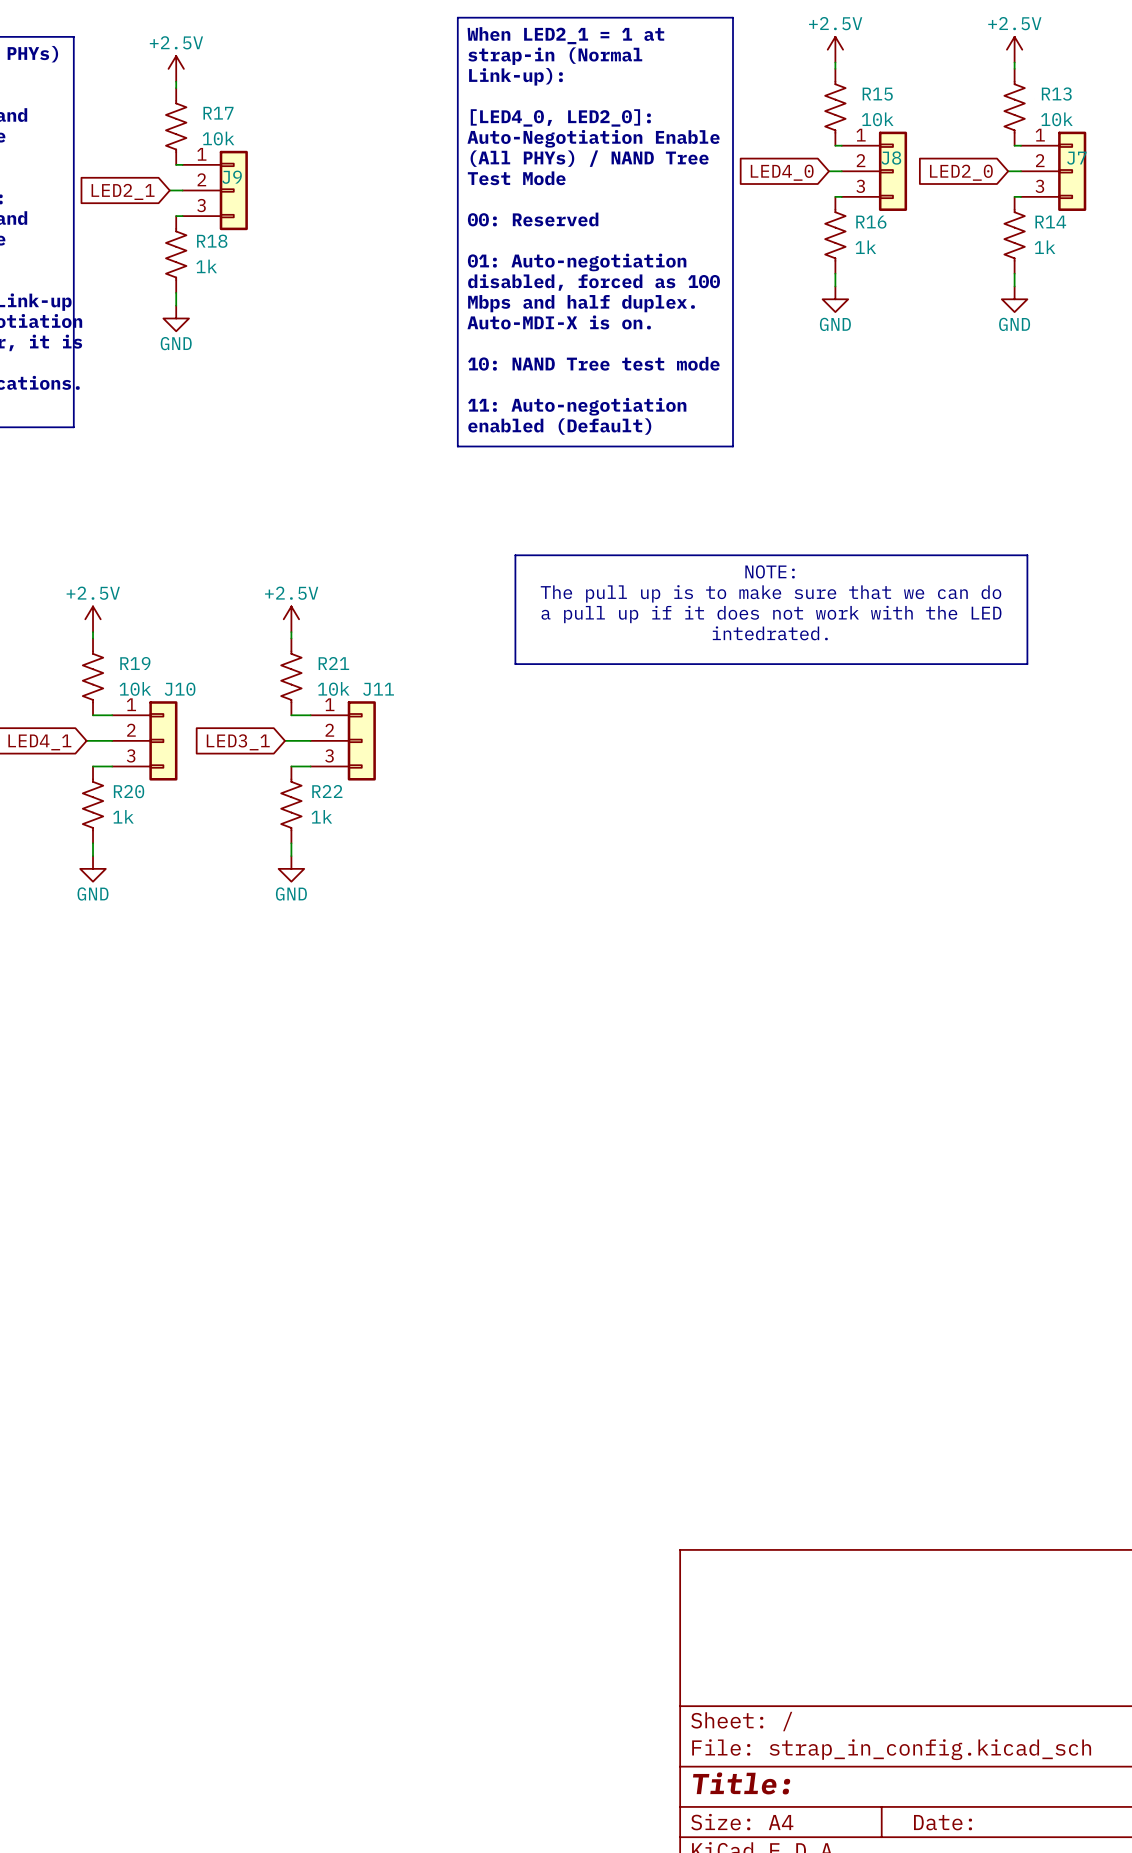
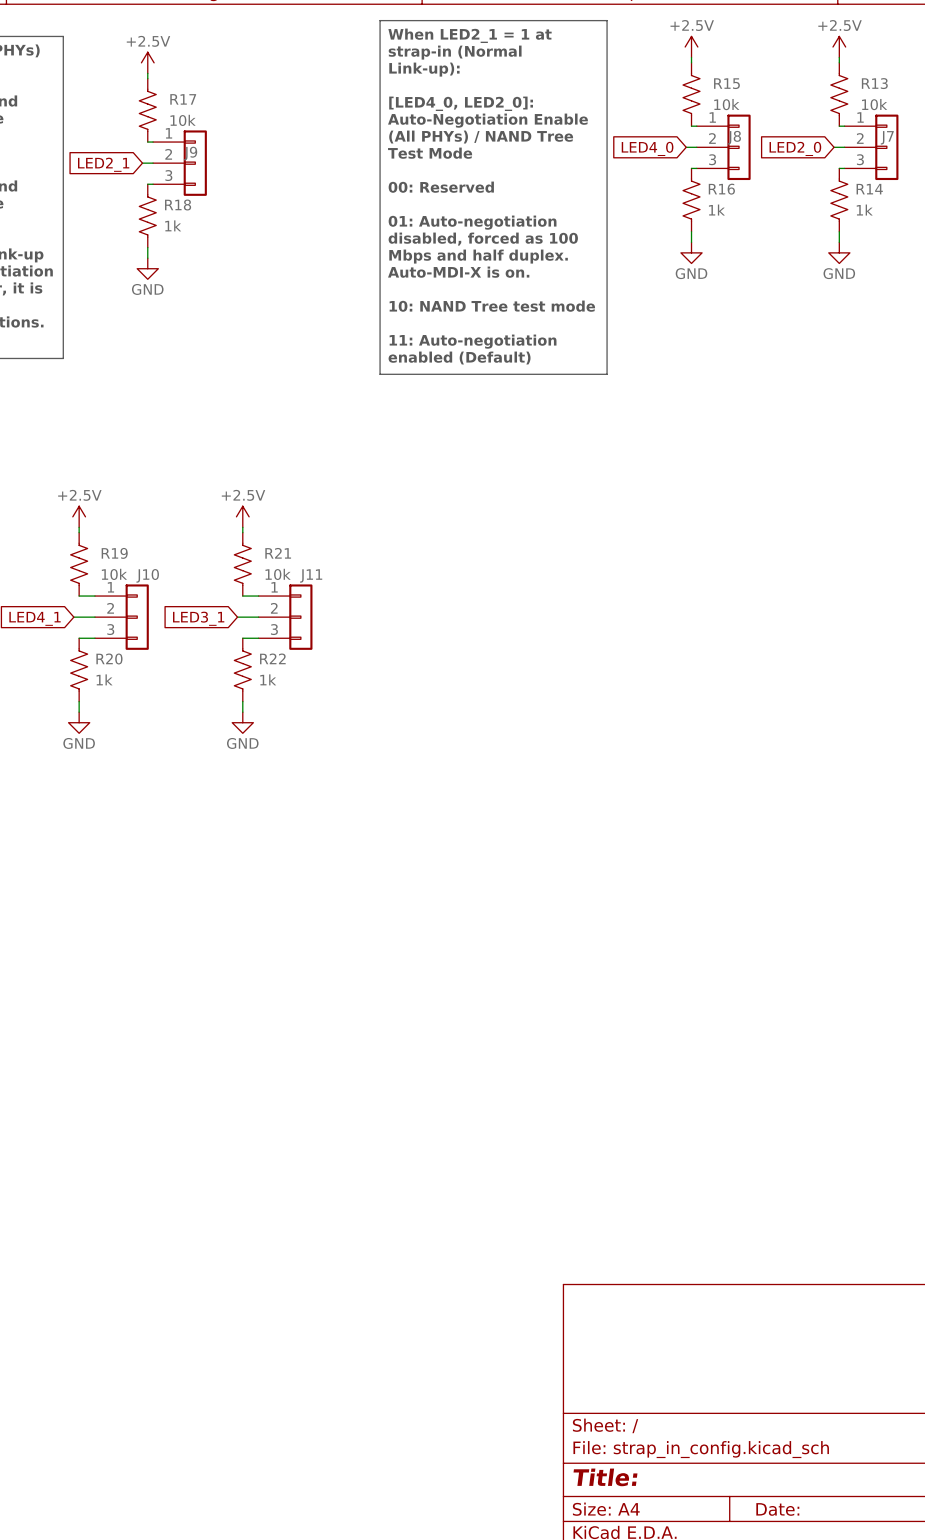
line: (515, 555) (1027, 555) (1027, 664) (515, 664) (515, 555) -> none
text: NOTE: (770, 571) -> none
text: The pull up is to make sure that we can do (771, 593) -> none
text: a pull up if it does not work with the LED (771, 614) -> none
text: intedrated. (770, 633) -> none

